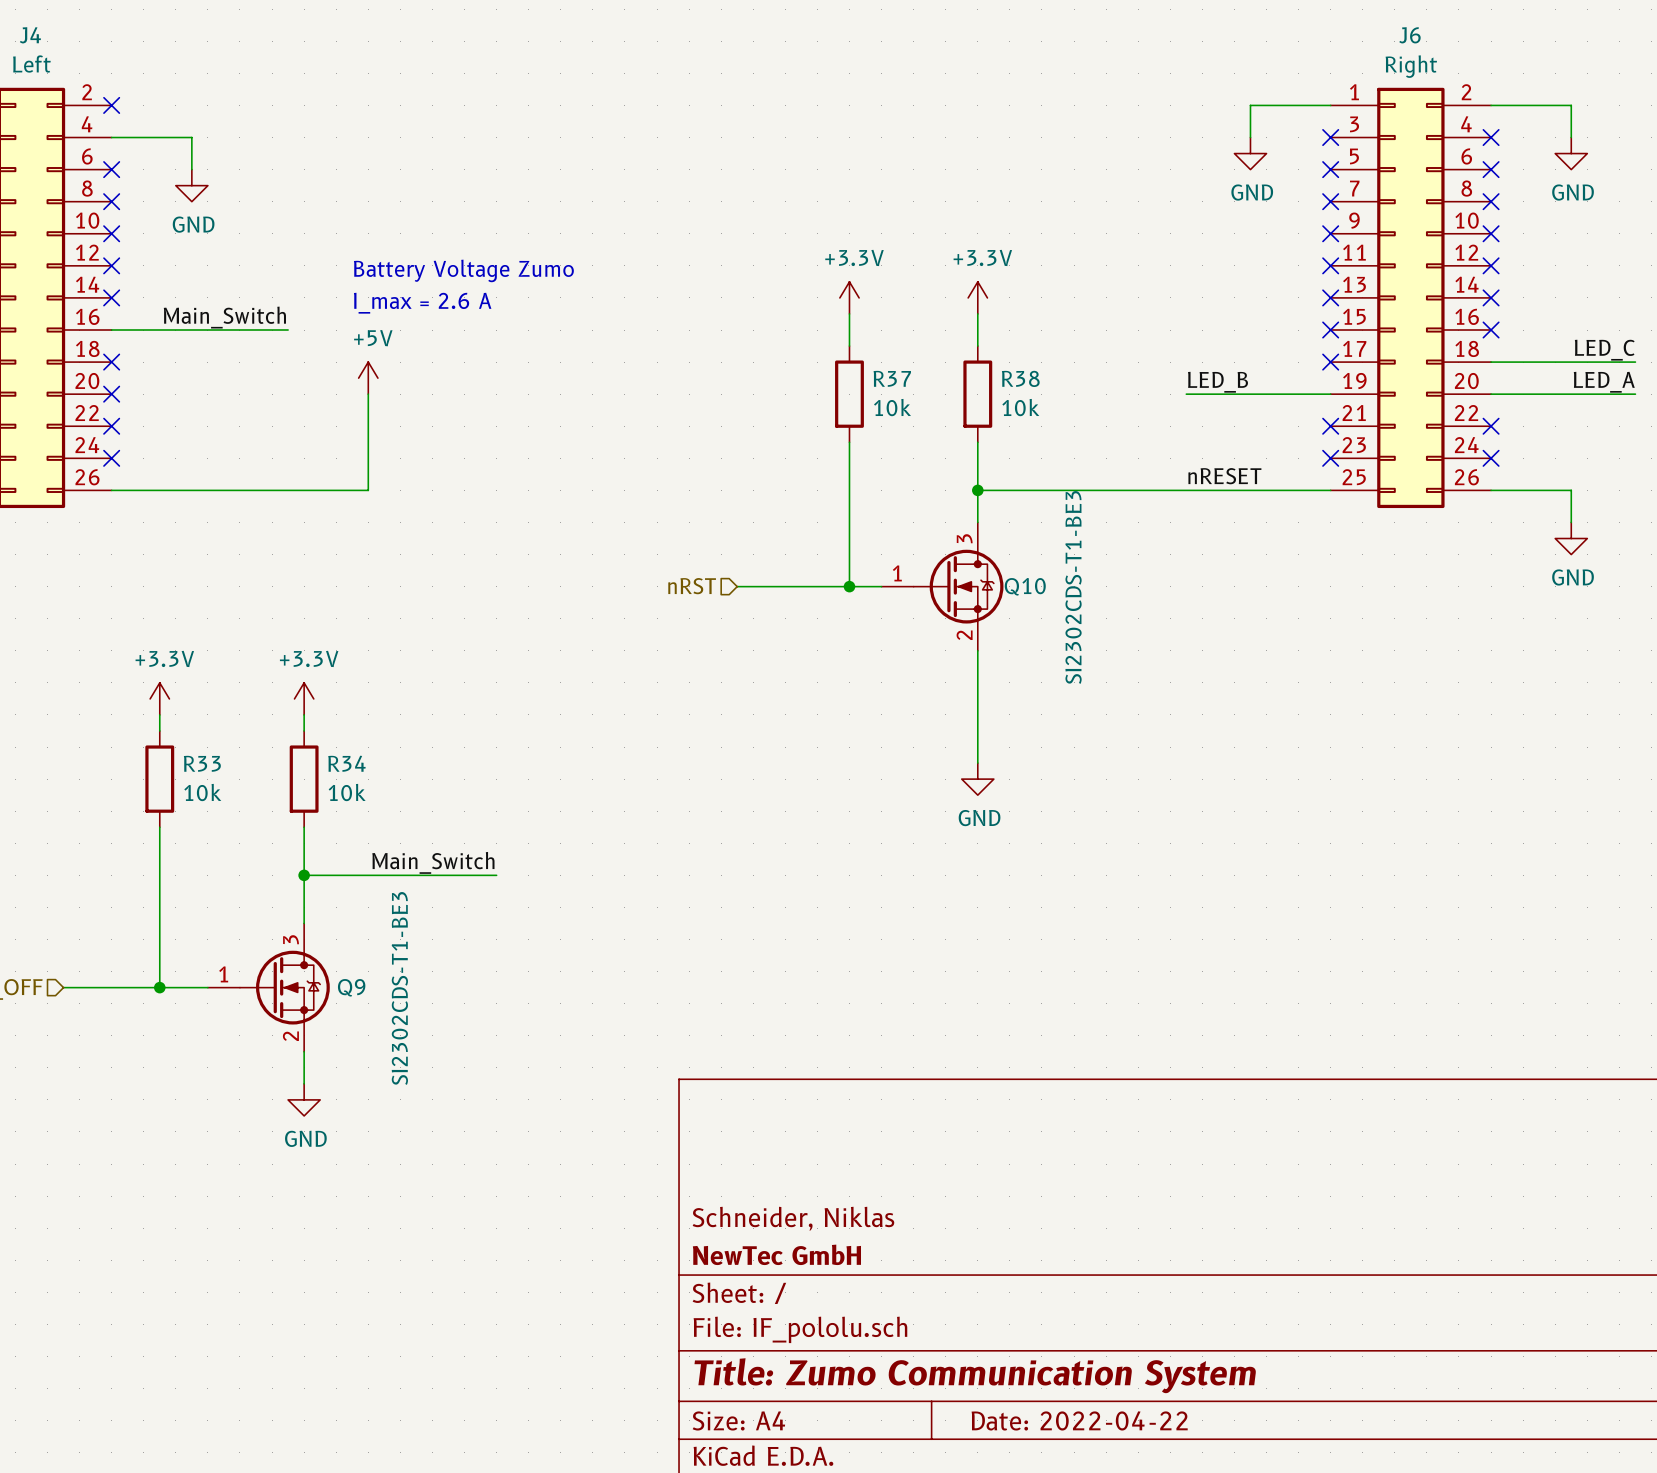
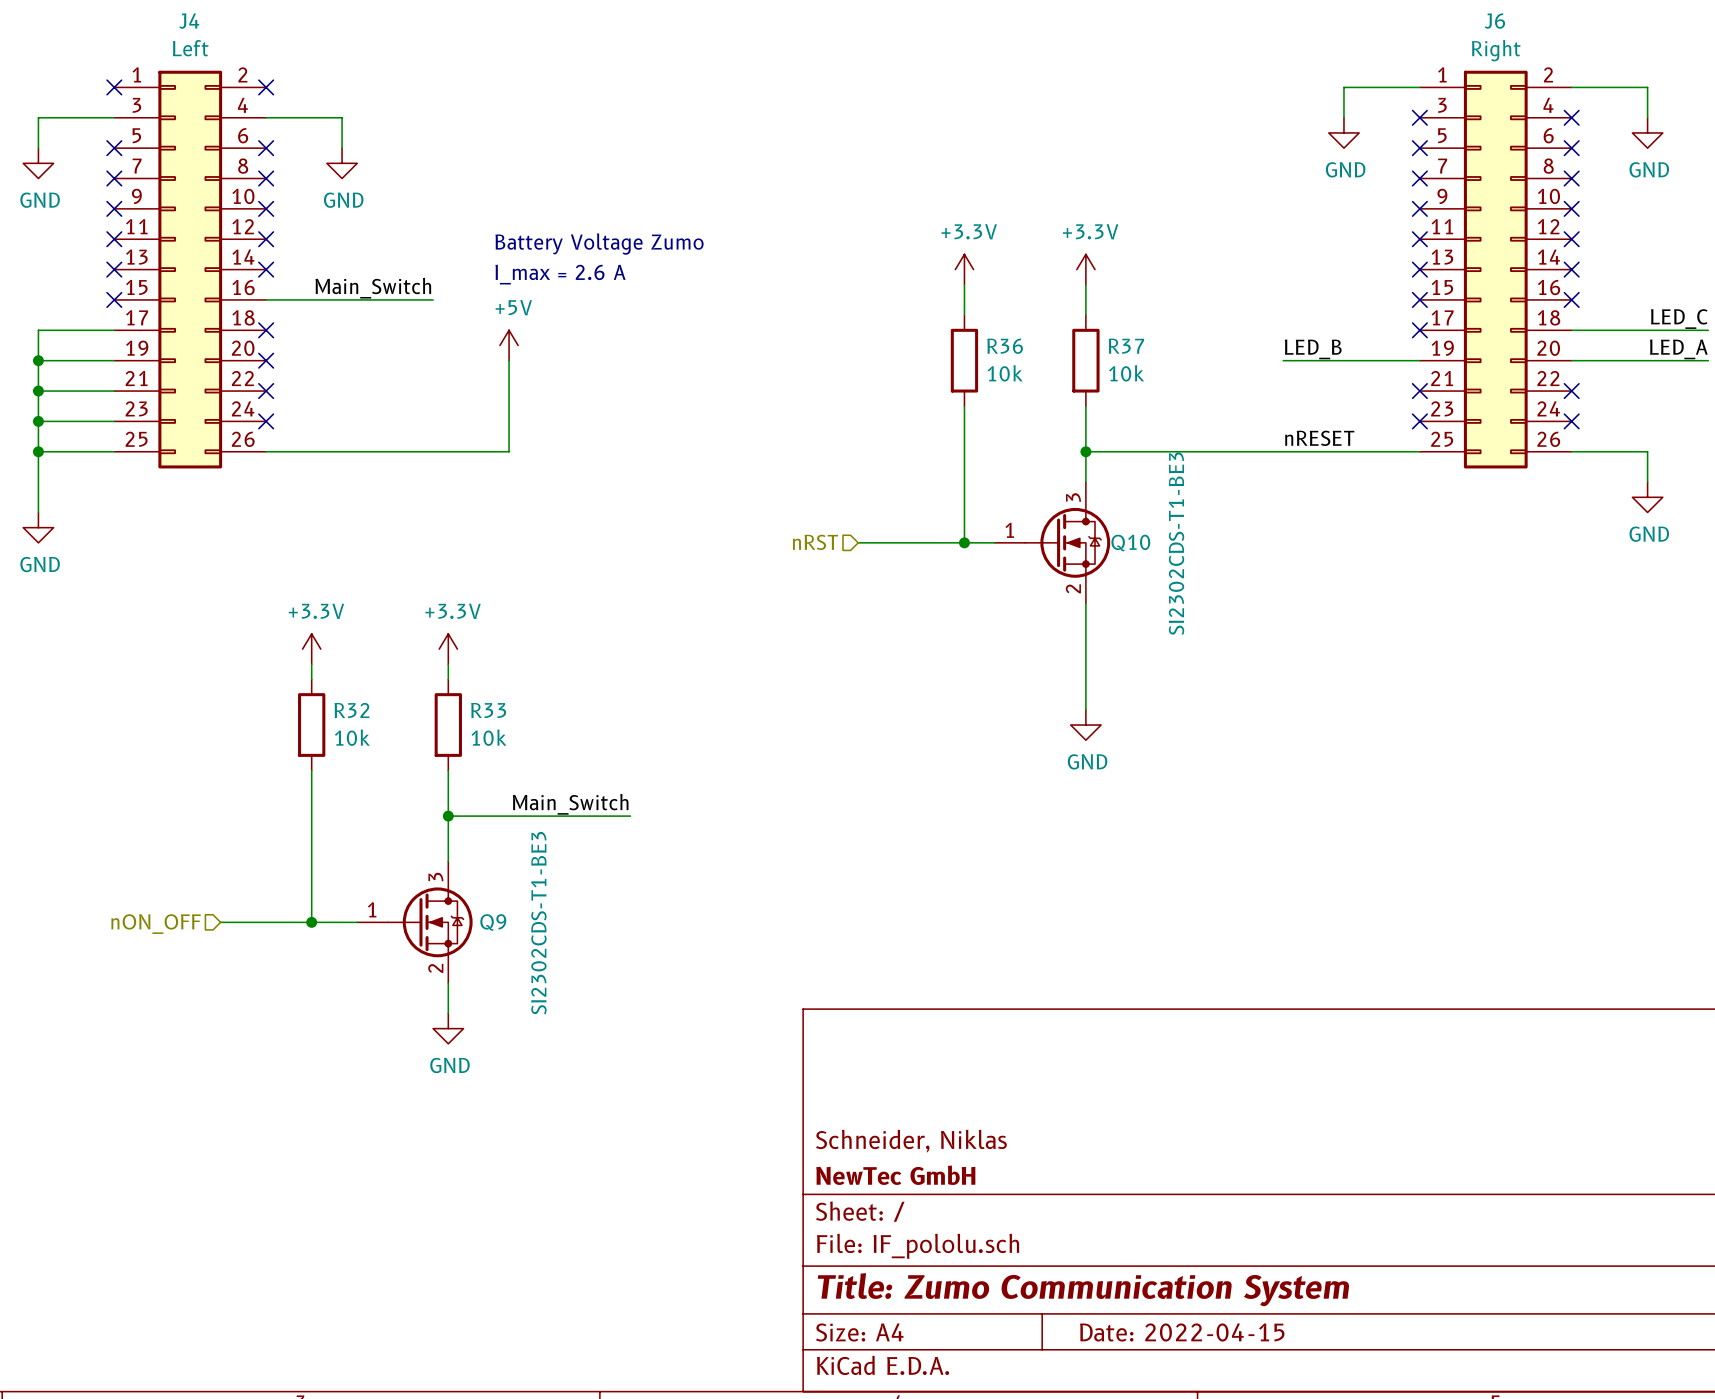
R37 name: R37 (892, 378) -> R36 (1005, 346)
R38 name: R38 (1020, 378) -> R37 (1126, 346)
R33 name: R33 (202, 763) -> R32 (351, 710)
R34 name: R34 (346, 763) -> R33 (488, 710)
title block: Date: 2022-04-22 (1079, 1420) -> Date: 2022-04-15 (1182, 1332)

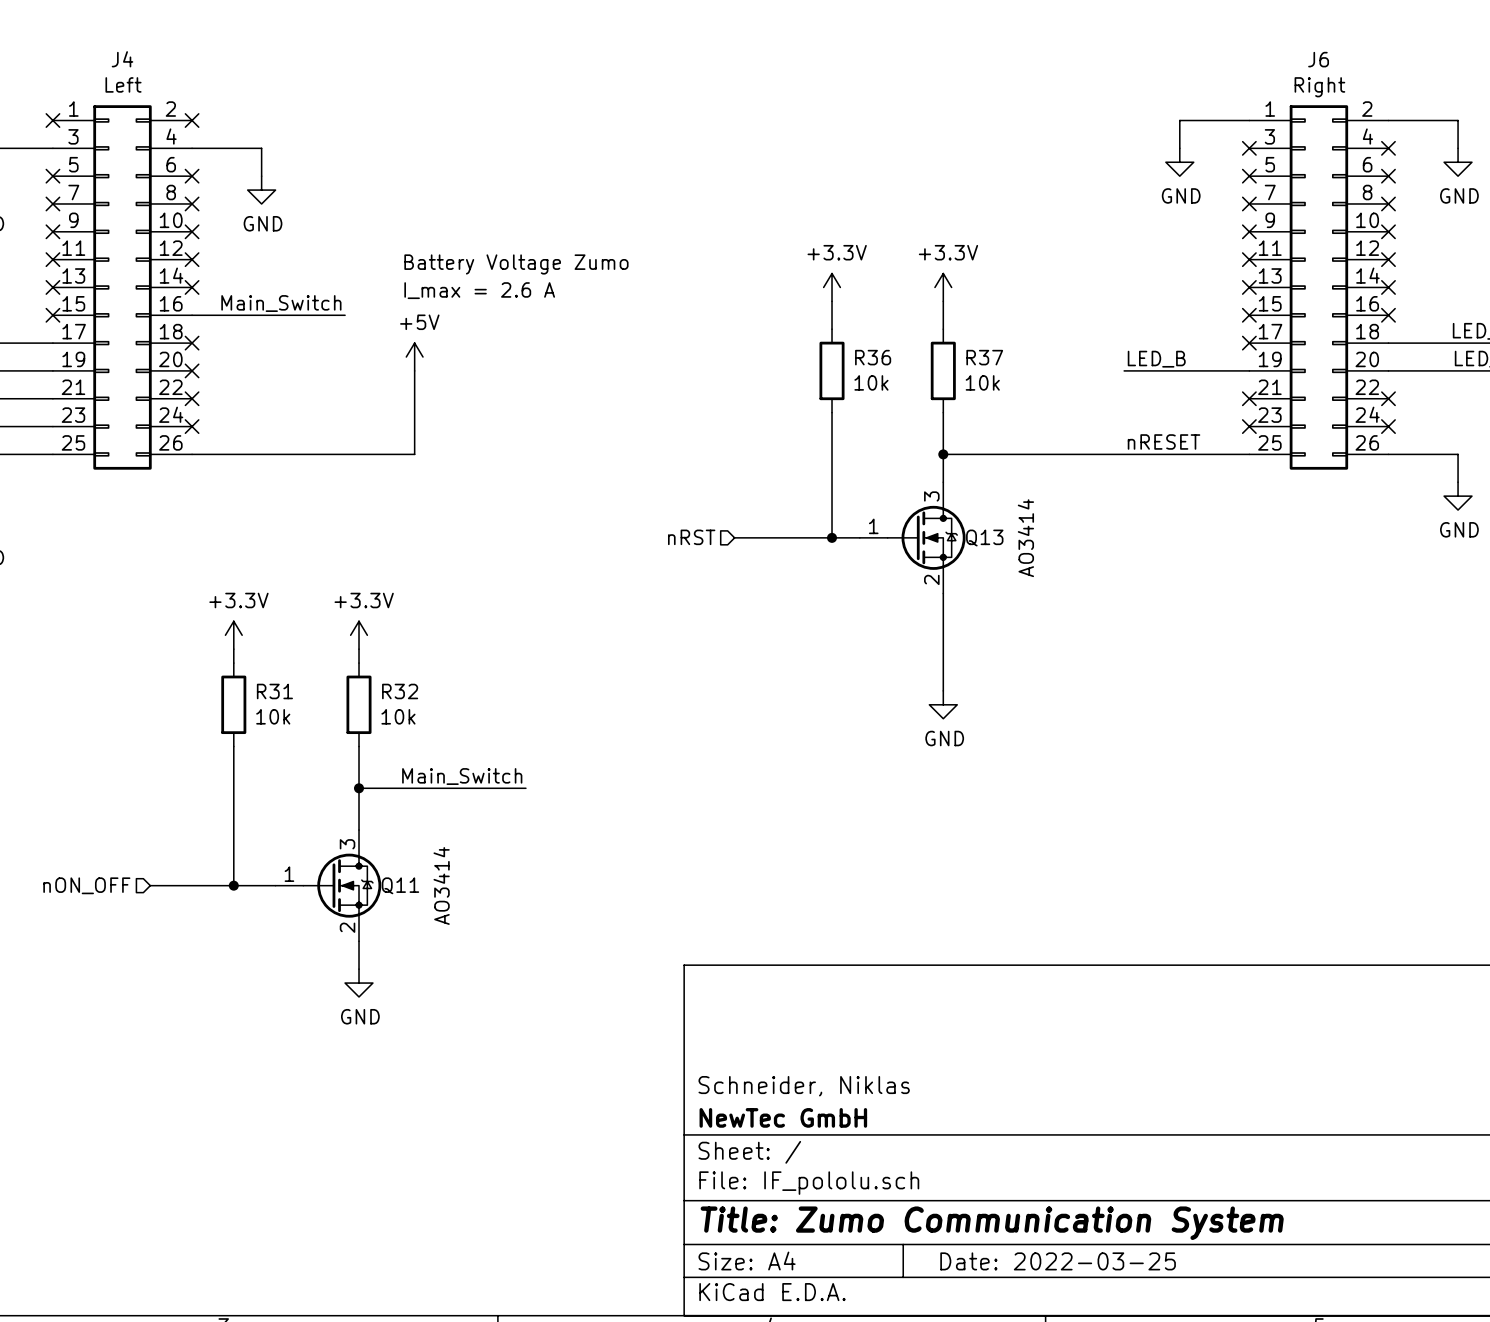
Q10 name: Q10 (1130, 543) -> Q13 (984, 538)
Q10 value: SI2302CDS-T1-BE3 (1176, 543) -> AO3414 (1025, 538)
R32 name: R32 (351, 710) -> R31 (274, 691)
R33 name: R33 (488, 710) -> R32 (400, 691)
Q9 name: Q9 (493, 922) -> Q11 (400, 885)
Q9 value: SI2302CDS-T1-BE3 (538, 923) -> AO3414 (441, 885)
title block: Date: 2022-04-15 (1182, 1332) -> Date: 2022-03-25 (1058, 1261)

